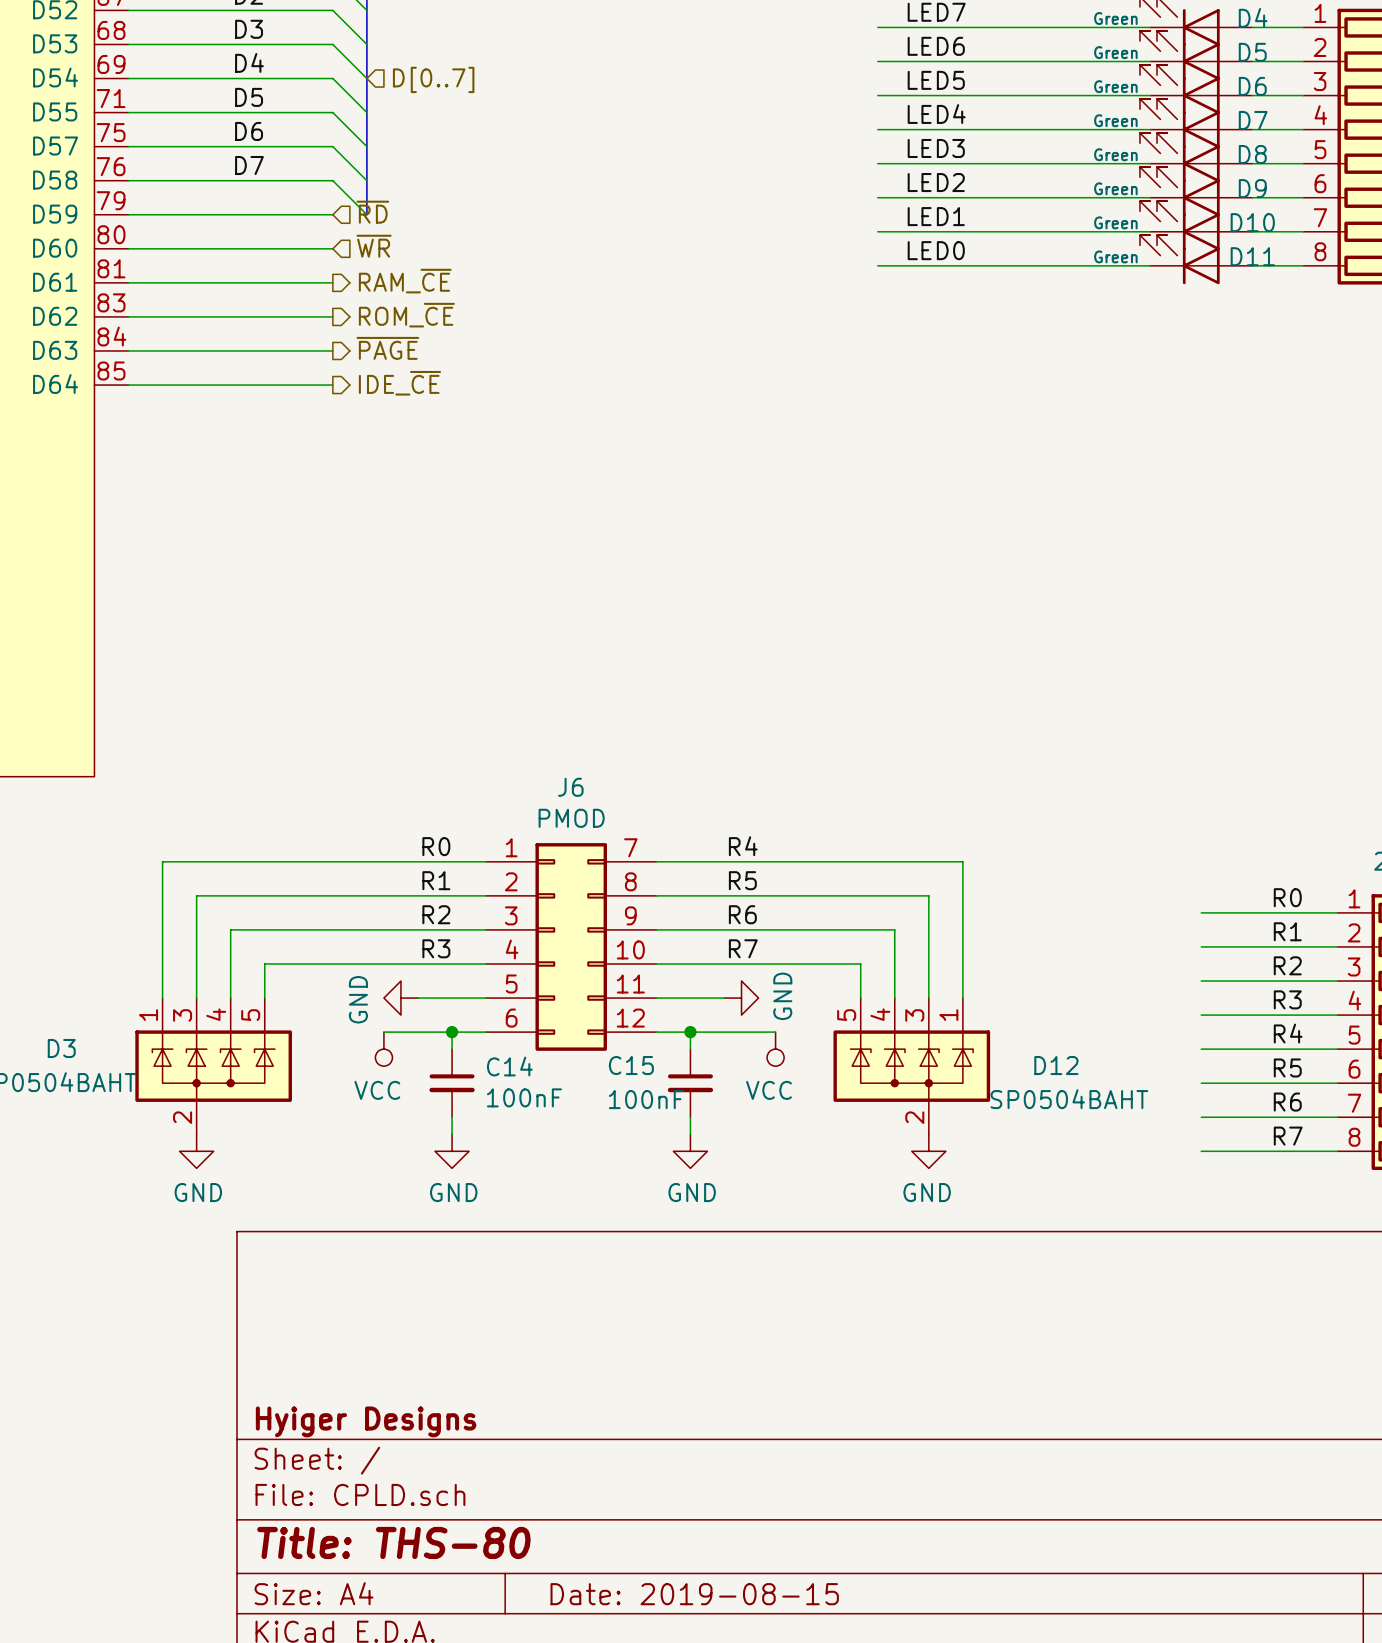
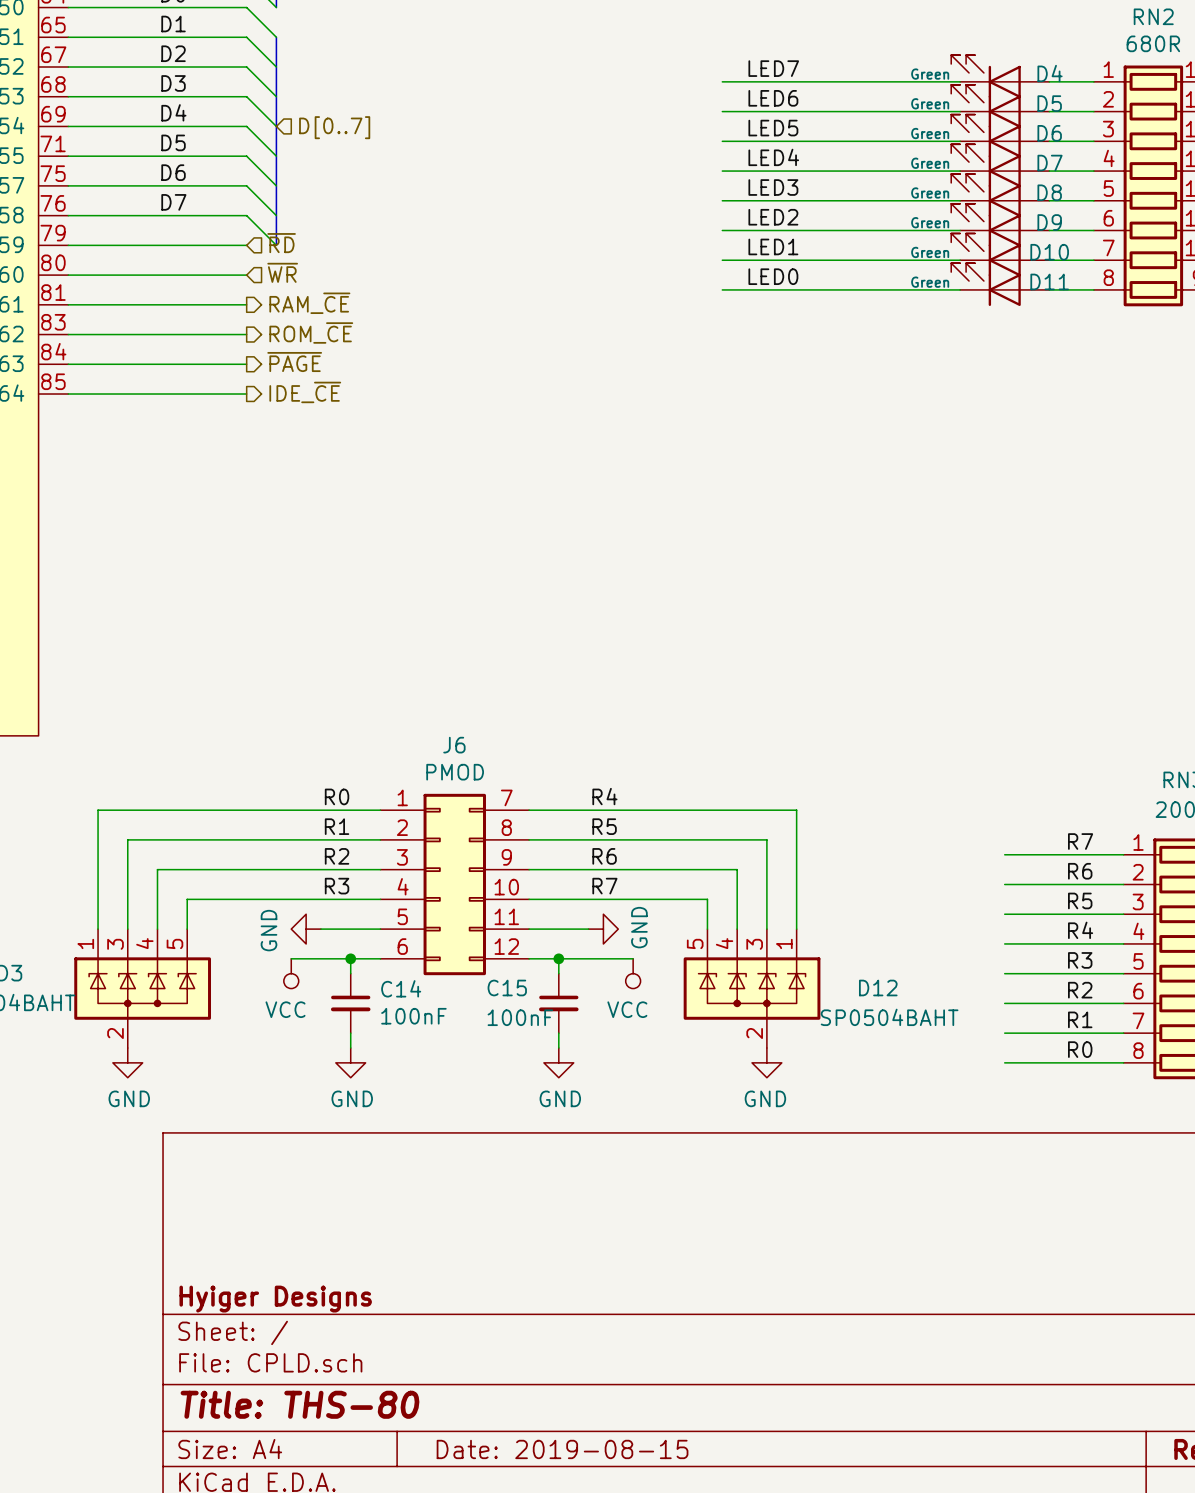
label: R0 (1287, 897) -> R7 (1080, 841)
label: R1 (1287, 931) -> R6 (1080, 871)
label: R2 (1287, 965) -> R5 (1080, 900)
label: R3 (1287, 999) -> R4 (1080, 930)
label: R4 (1288, 1033) -> R3 (1080, 960)
label: R5 (1287, 1067) -> R2 (1080, 990)
label: R6 (1287, 1102) -> R1 (1080, 1019)
label: R7 (1288, 1136) -> R0 (1080, 1049)

